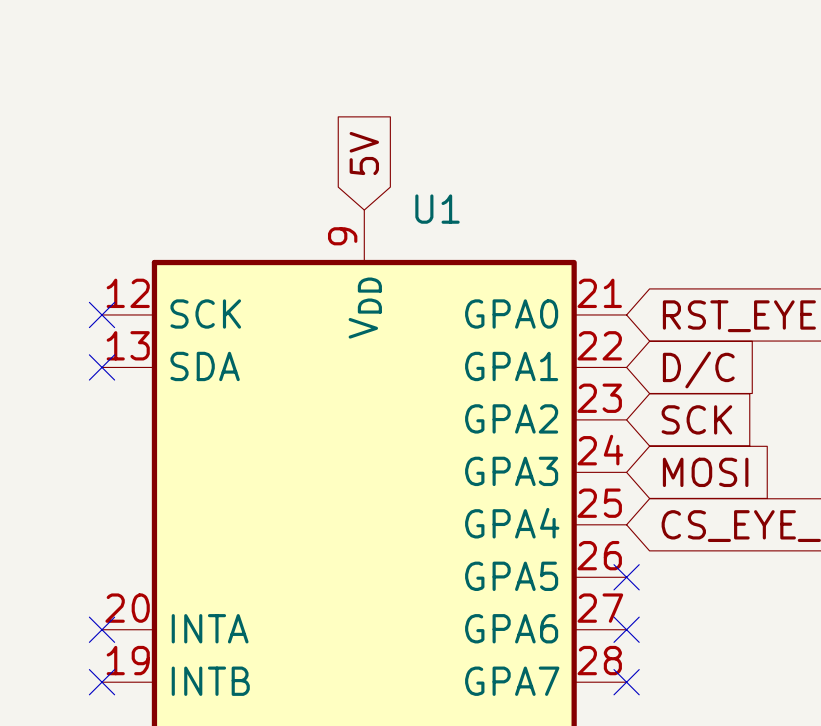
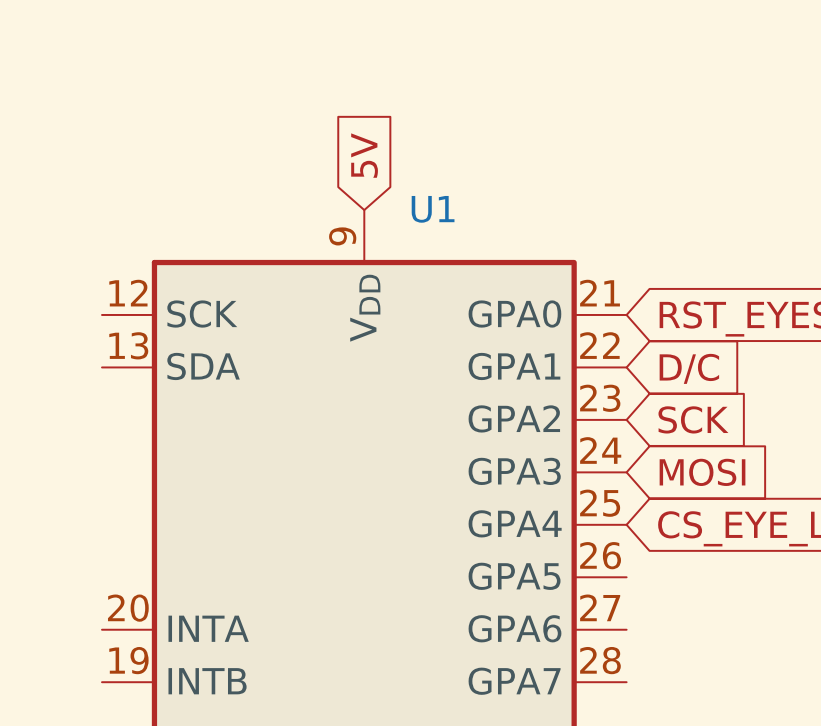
no-connect mark: (102, 314) -> none
no-connect mark: (102, 367) -> none
no-connect mark: (626, 577) -> none
no-connect mark: (102, 629) -> none
no-connect mark: (626, 629) -> none
no-connect mark: (102, 682) -> none
no-connect mark: (626, 682) -> none

